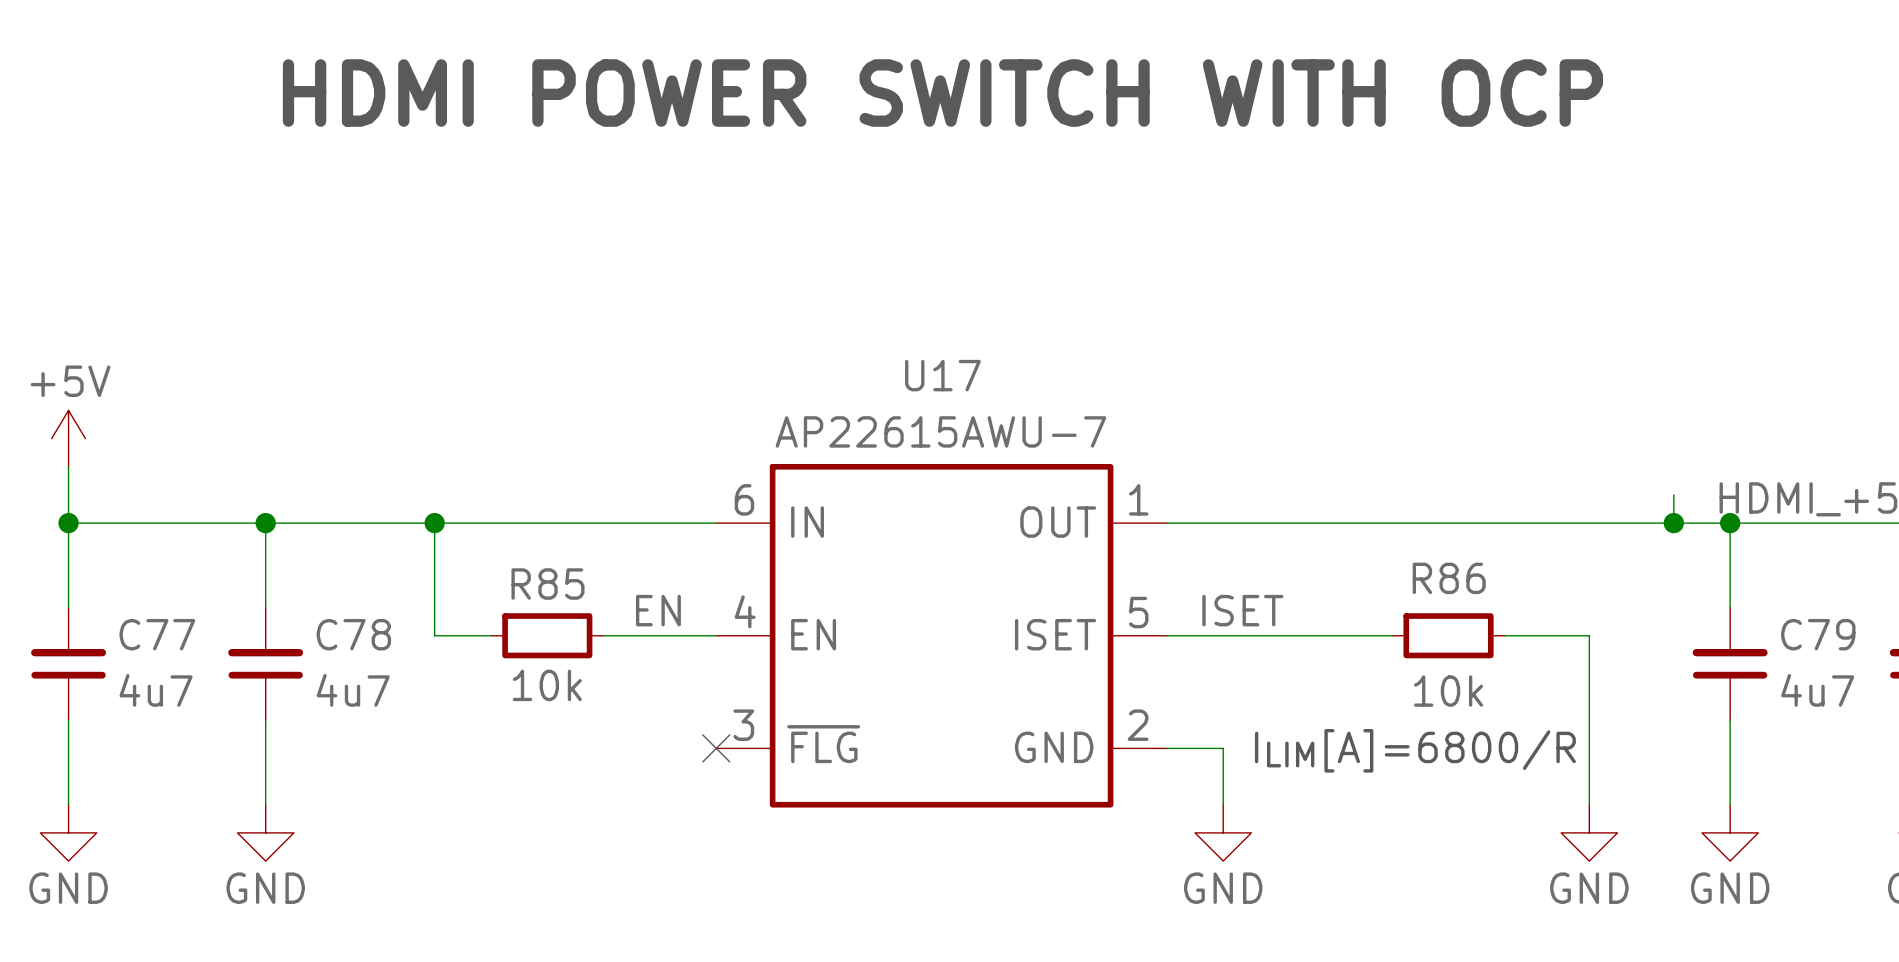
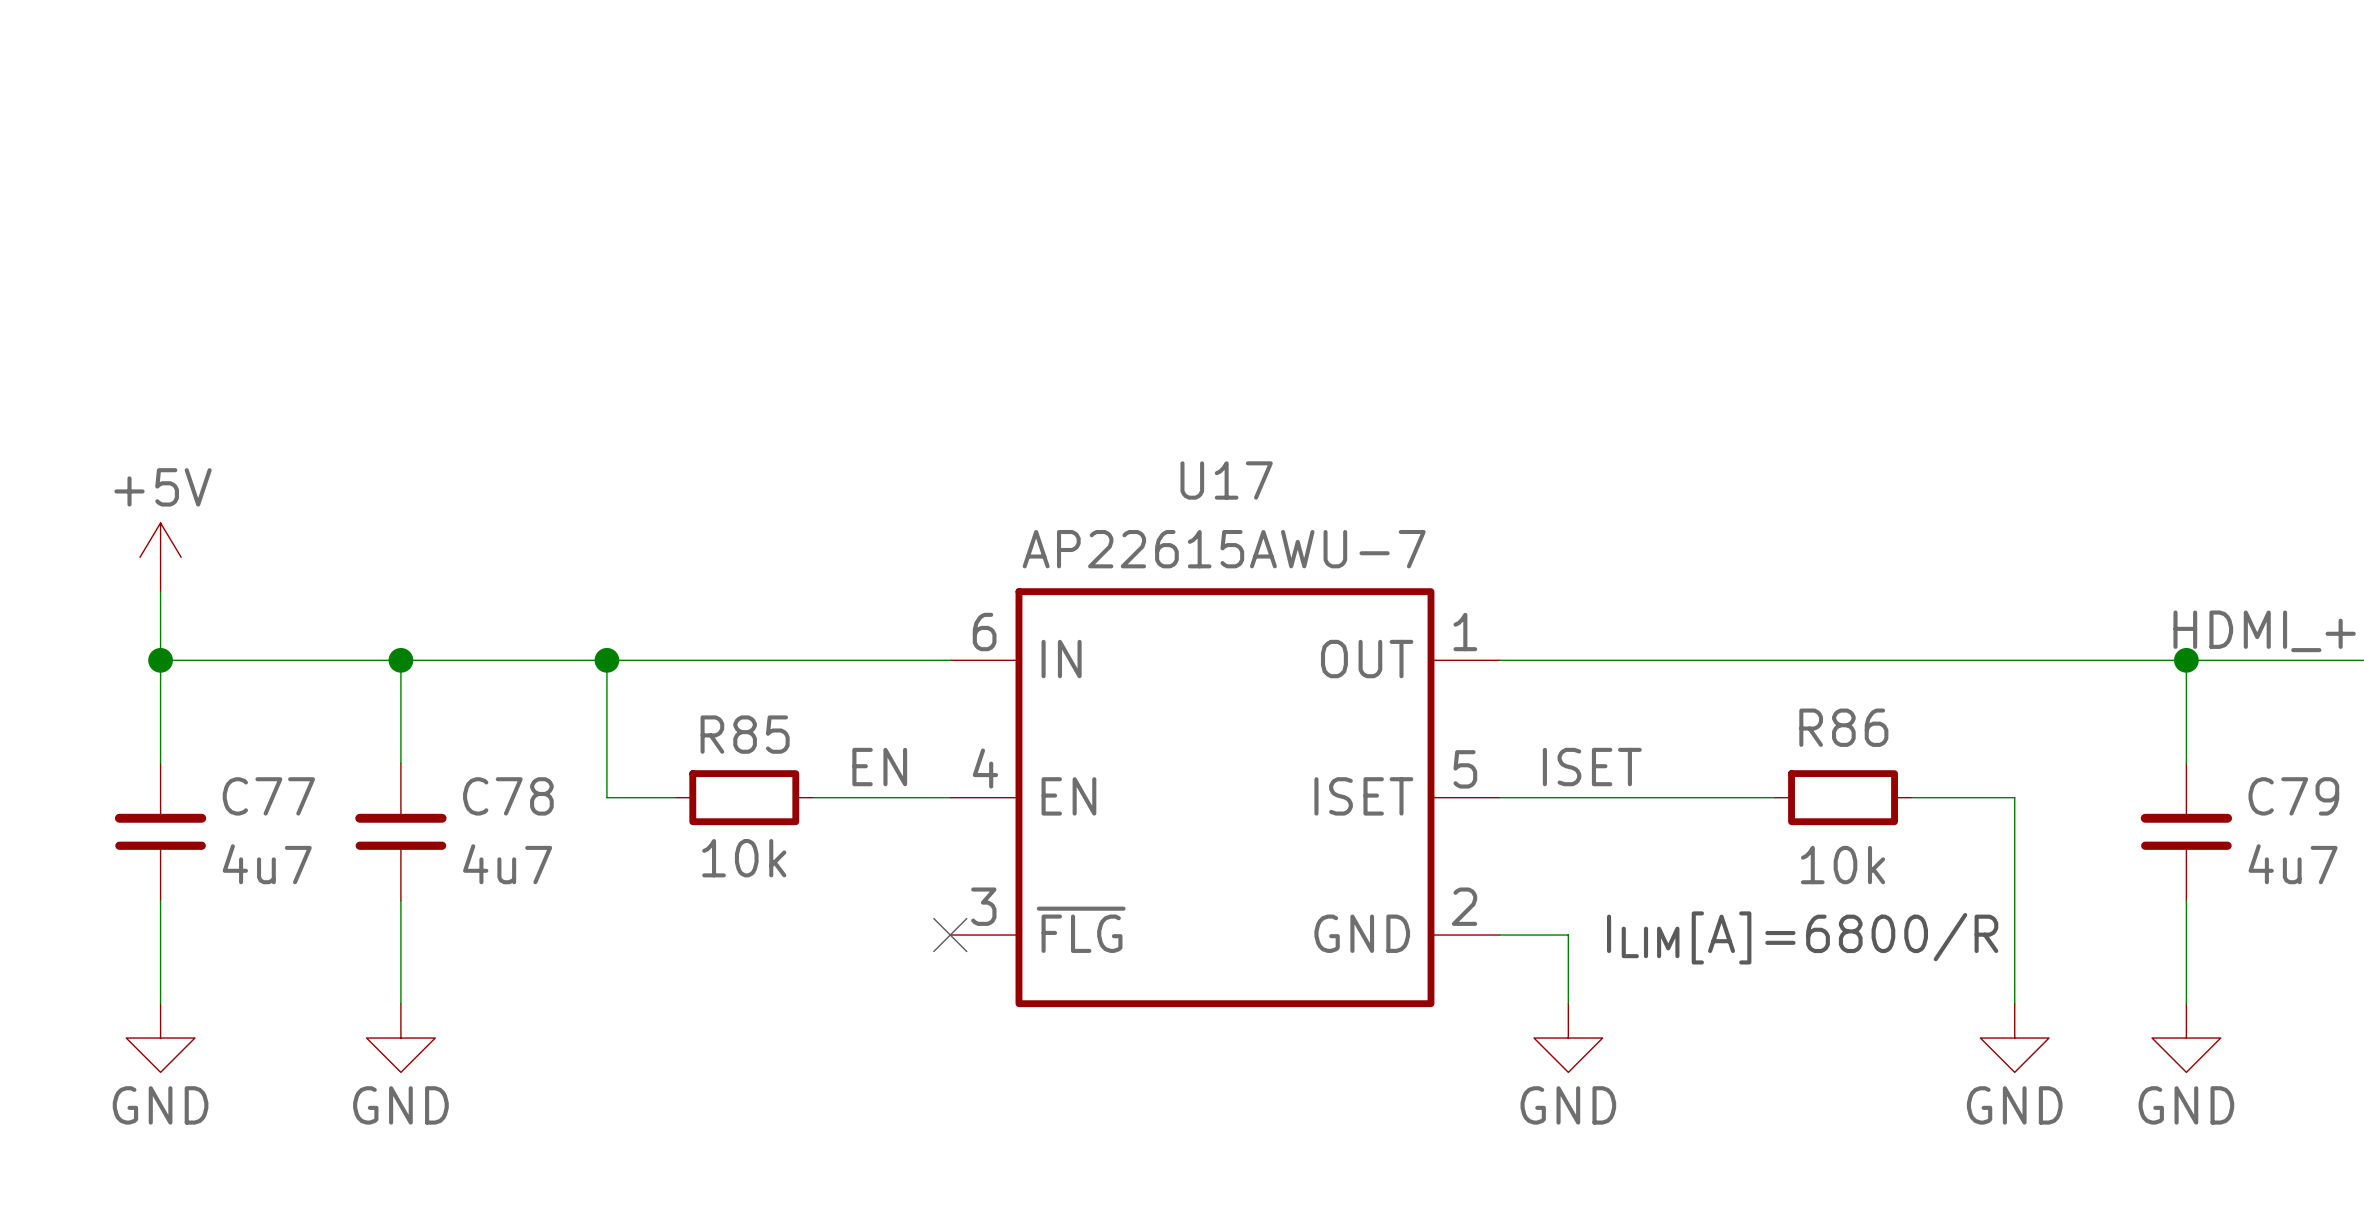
text: HDMI POWER SWITCH WITH OCP (942, 93) -> none
wire: (1673, 494) (1673, 523) -> none
junction: (1673, 523) -> none

